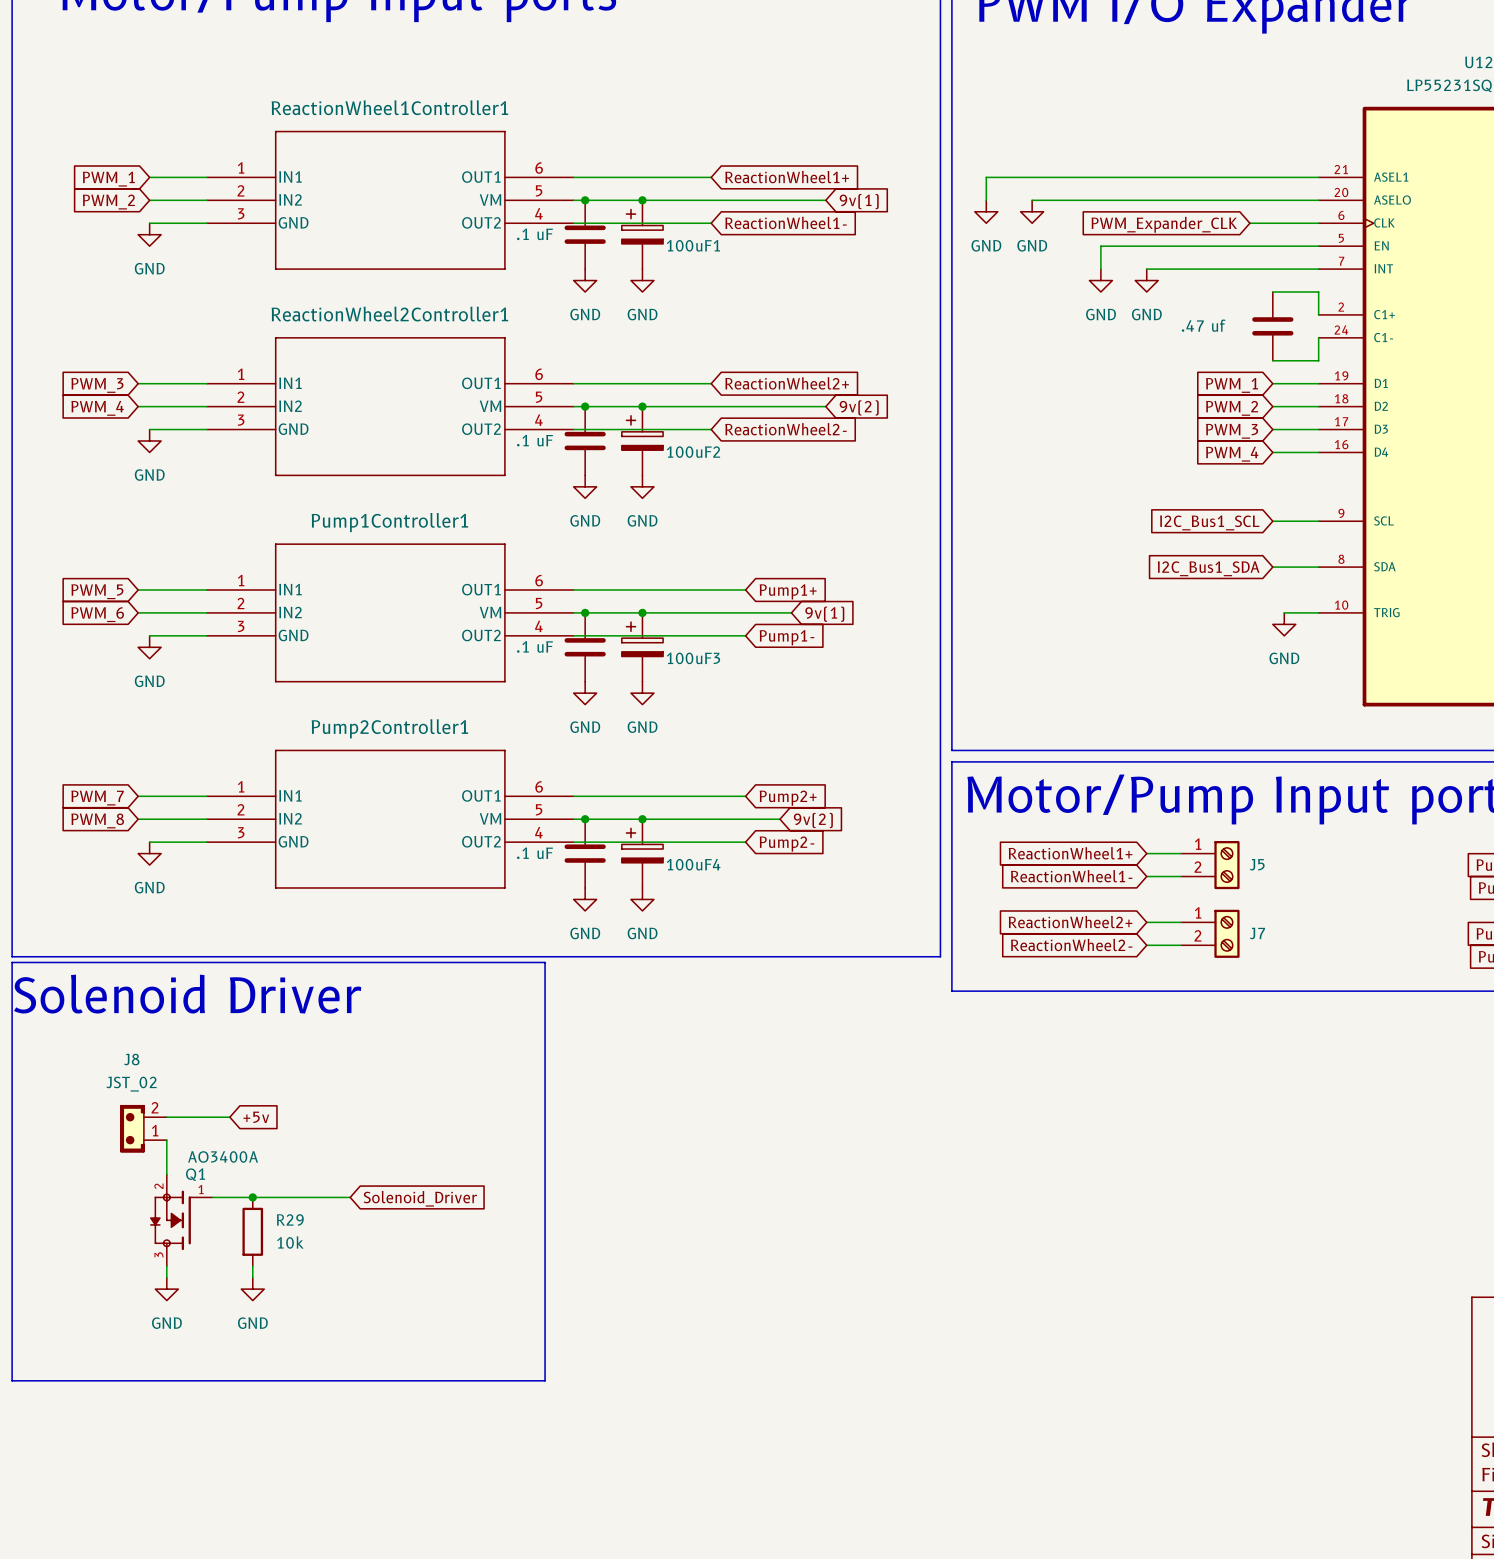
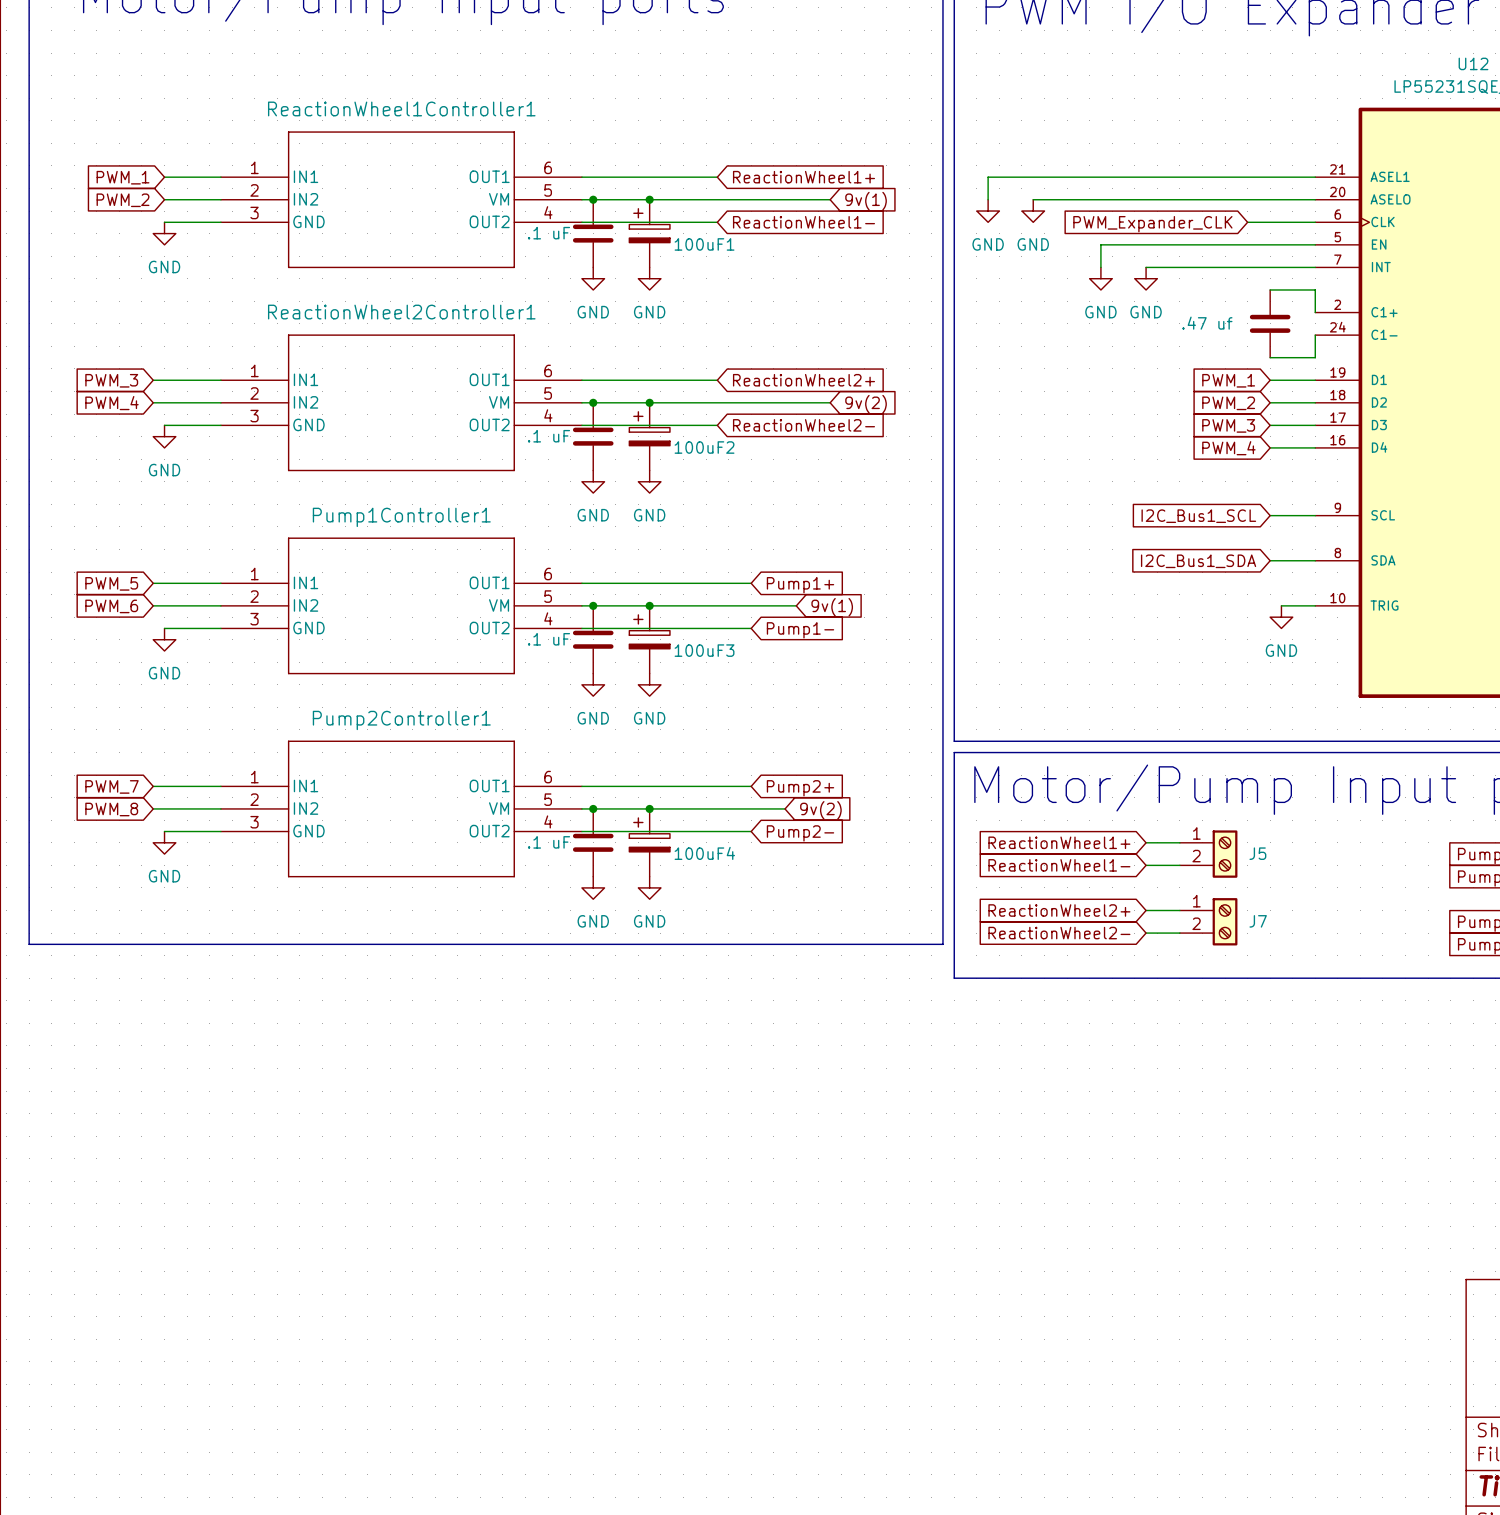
line: (12, 962) (545, 962) (545, 1380) (12, 1380) (12, 962) -> none
text: Solenoid Driver (187, 994) -> none
wire: (166, 1117) (229, 1117) -> none
global label: +5v (256, 1117) -> none
J8: JST_02 (143, 1128) -> none
wire: (166, 1140) (166, 1174) -> none
wire: (212, 1197) (350, 1197) -> none
junction: (252, 1197) -> none
global label: Solenoid_Driver (420, 1198) -> none
Q1: AO3400A (181, 1220) -> none
R29: 10k (252, 1231) -> none
wire: (166, 1266) (166, 1277) -> none
wire: (252, 1266) (252, 1277) -> none
power symbol: GND (166, 1289) -> none
power symbol: GND (252, 1289) -> none

